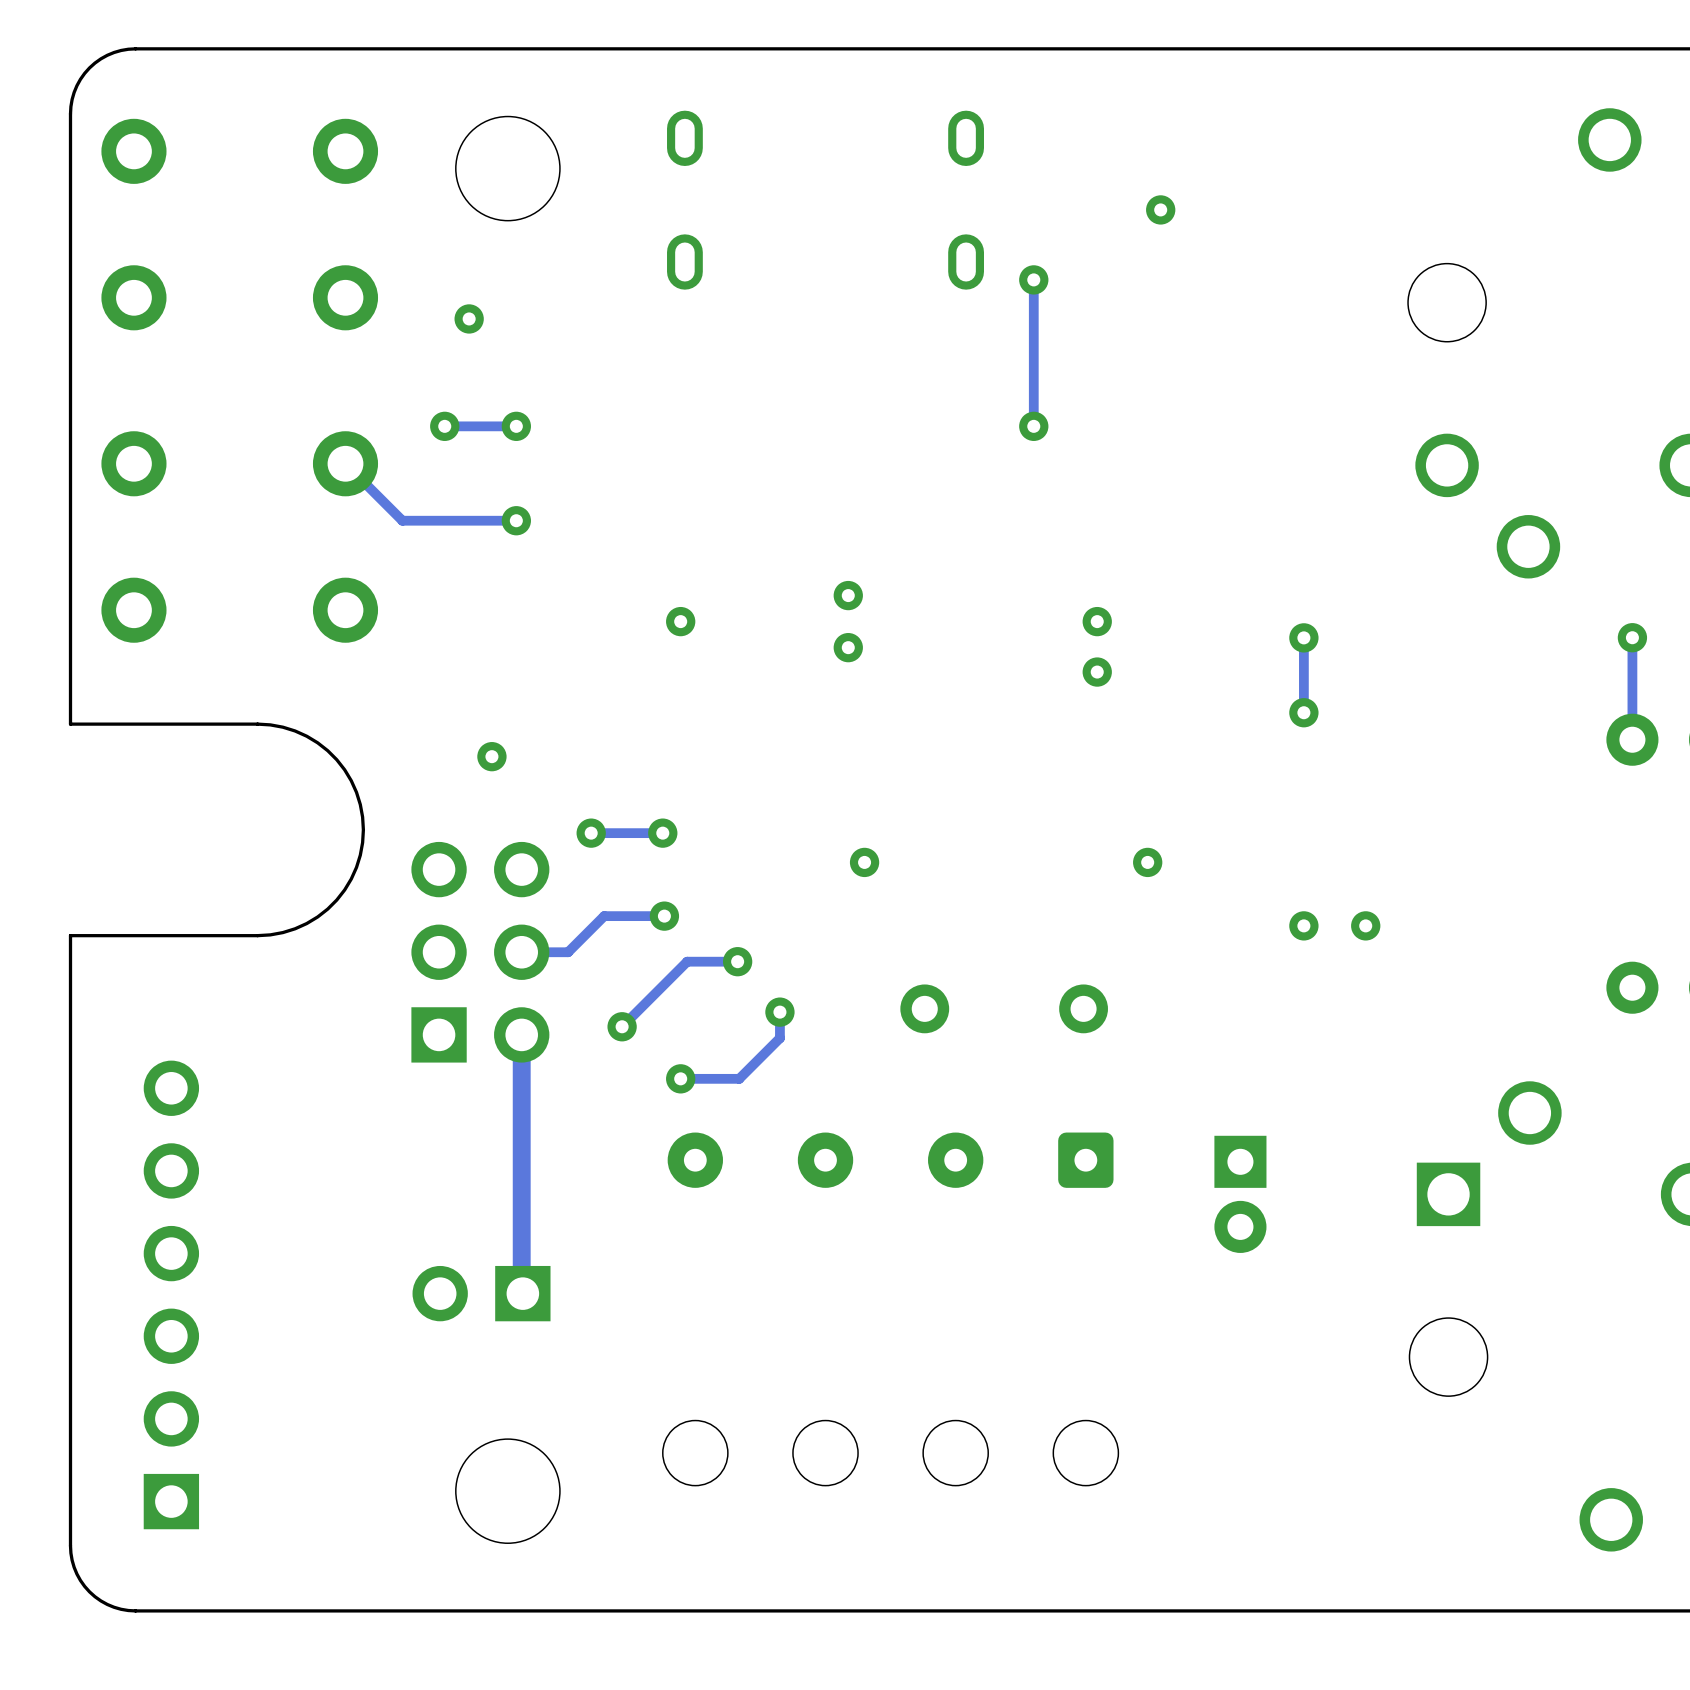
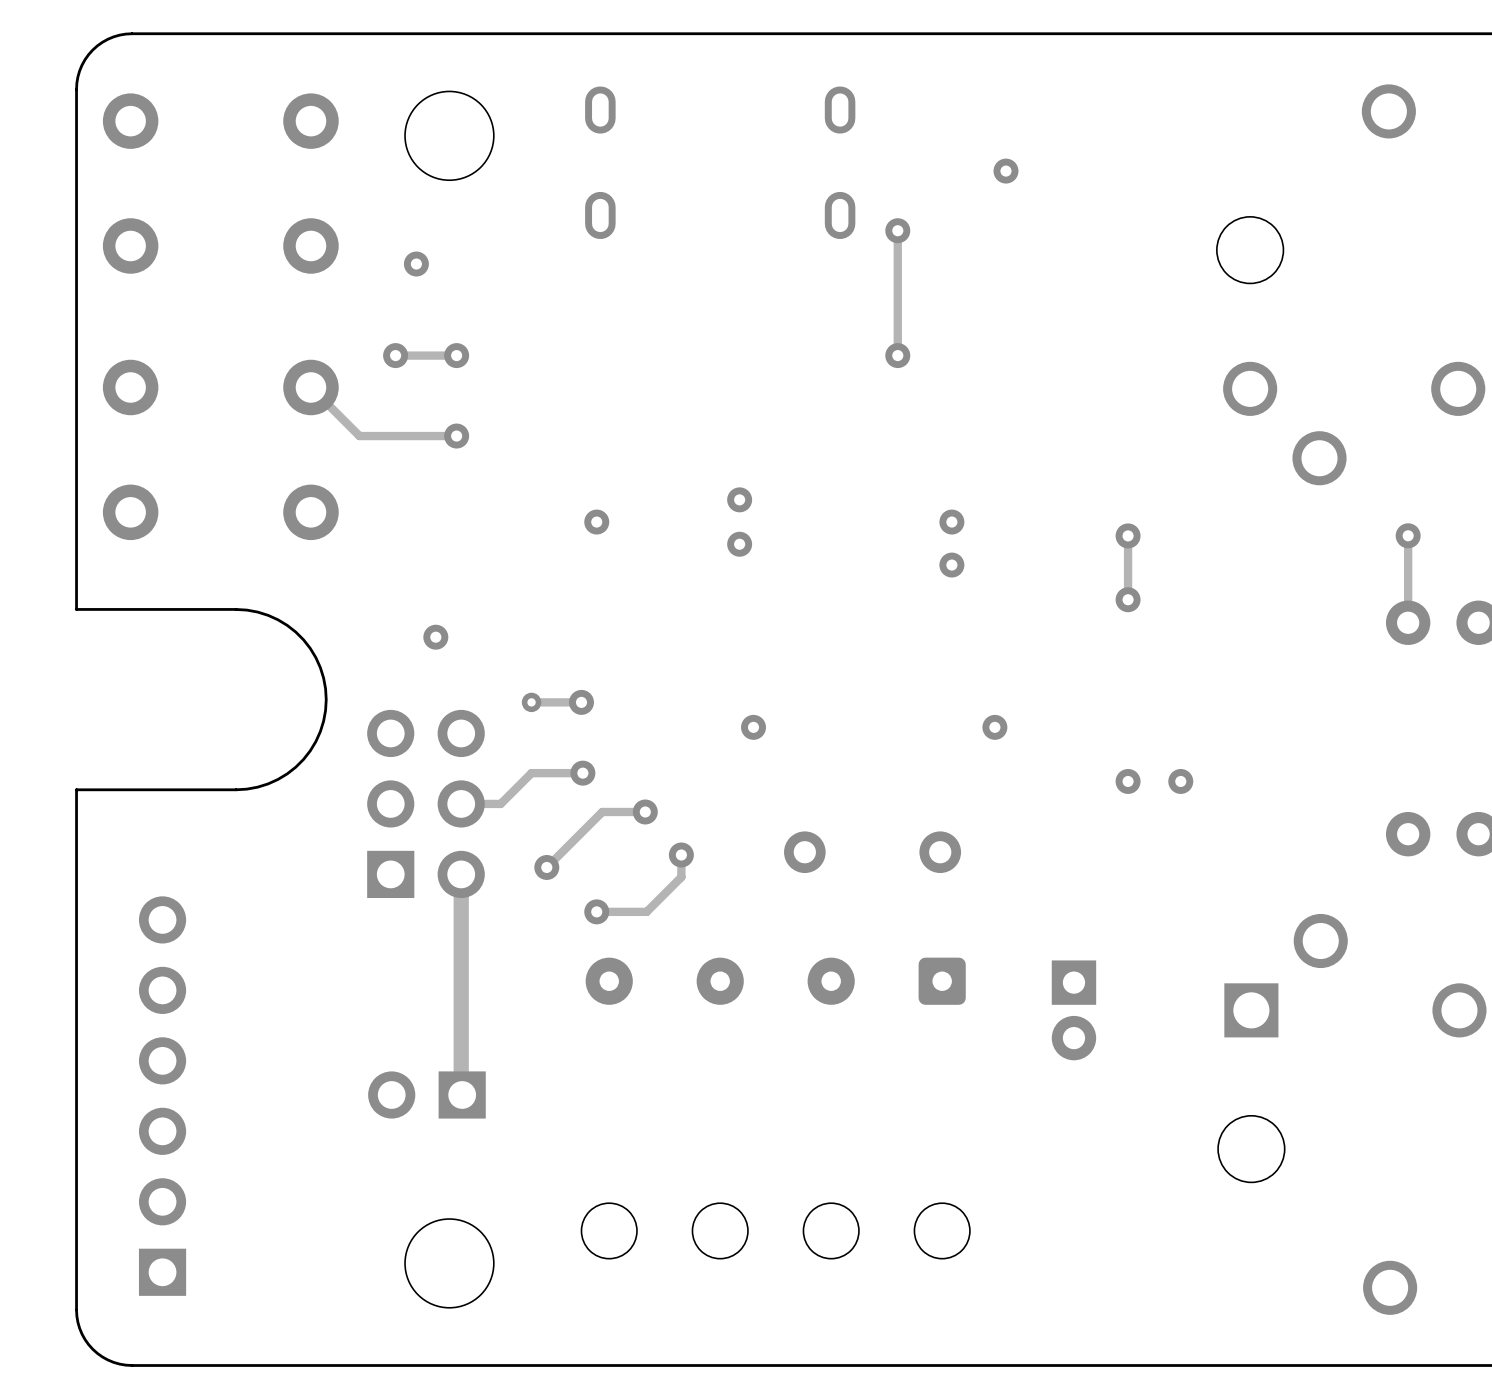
via size: [576, 818, 606, 848] -> [521, 692, 542, 713]

